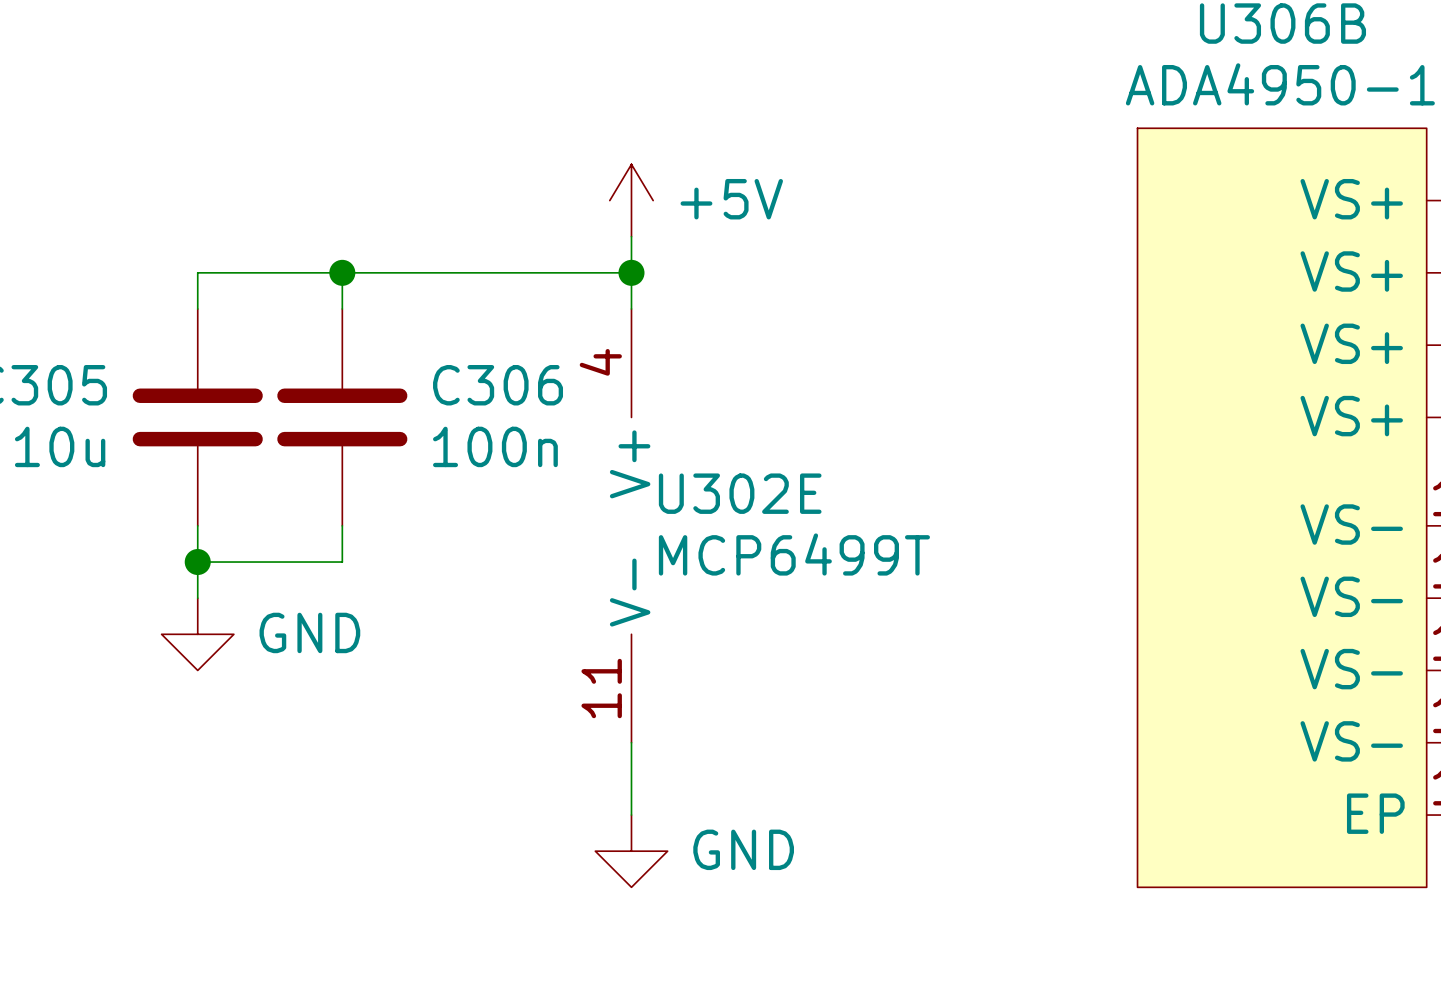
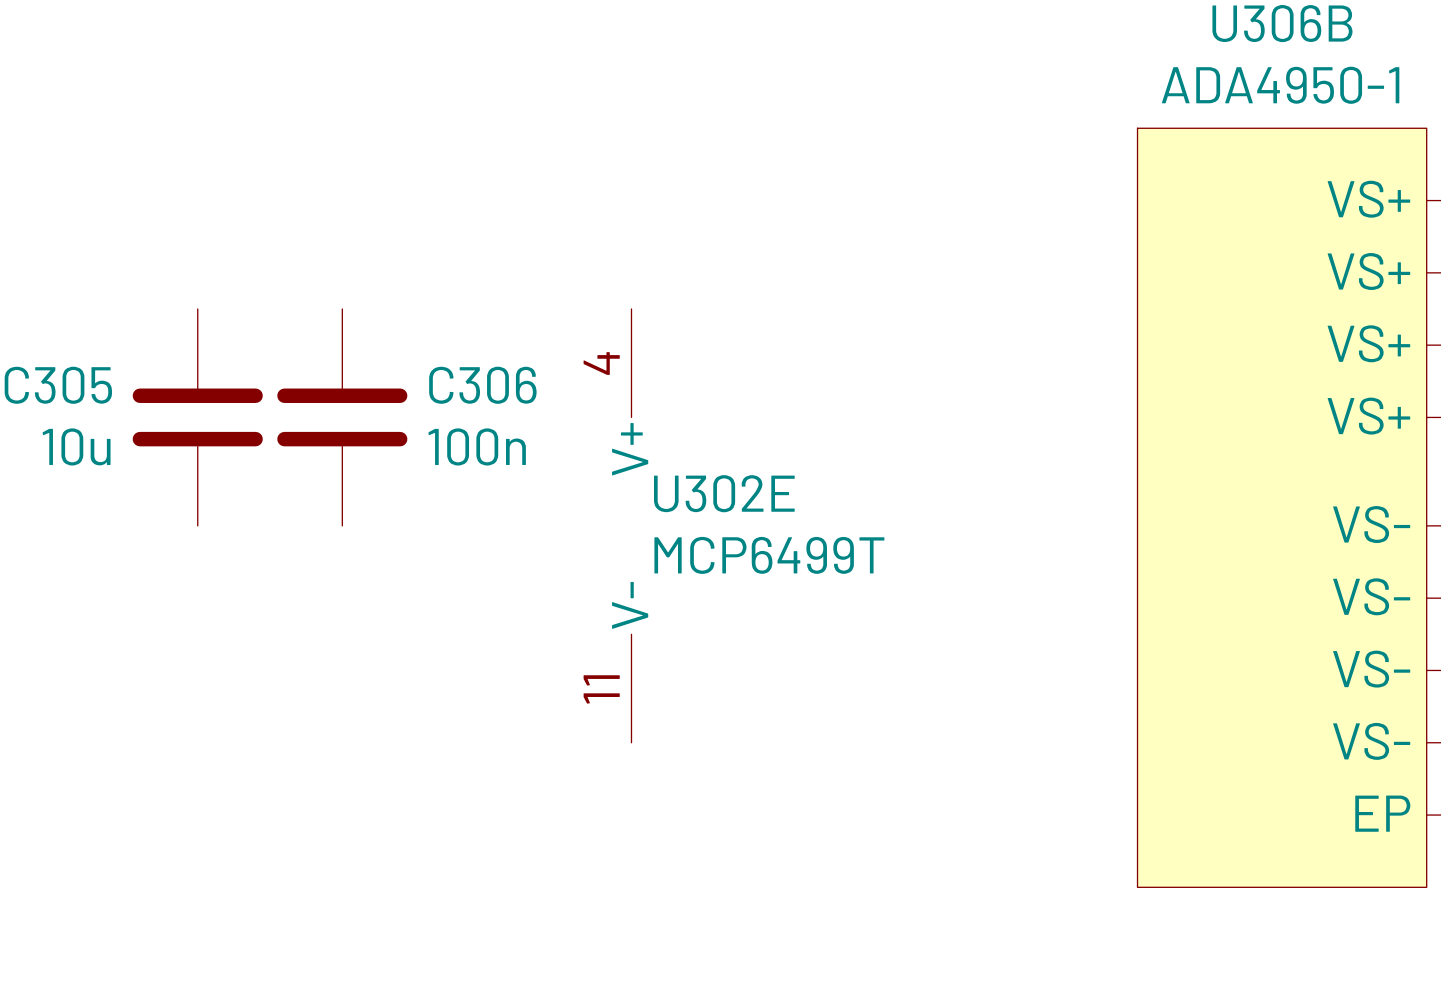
power symbol: +5V (631, 200) -> none
wire: (631, 236) (631, 309) -> none
wire: (342, 272) (342, 309) -> none
junction: (342, 272) -> none
wire: (631, 272) (197, 272) (197, 309) -> none
junction: (631, 272) -> none
wire: (197, 525) (197, 598) -> none
wire: (342, 525) (342, 562) (197, 562) -> none
junction: (197, 562) -> none
power symbol: GND (197, 634) -> none
wire: (631, 742) (631, 815) -> none
power symbol: GND (631, 851) -> none

